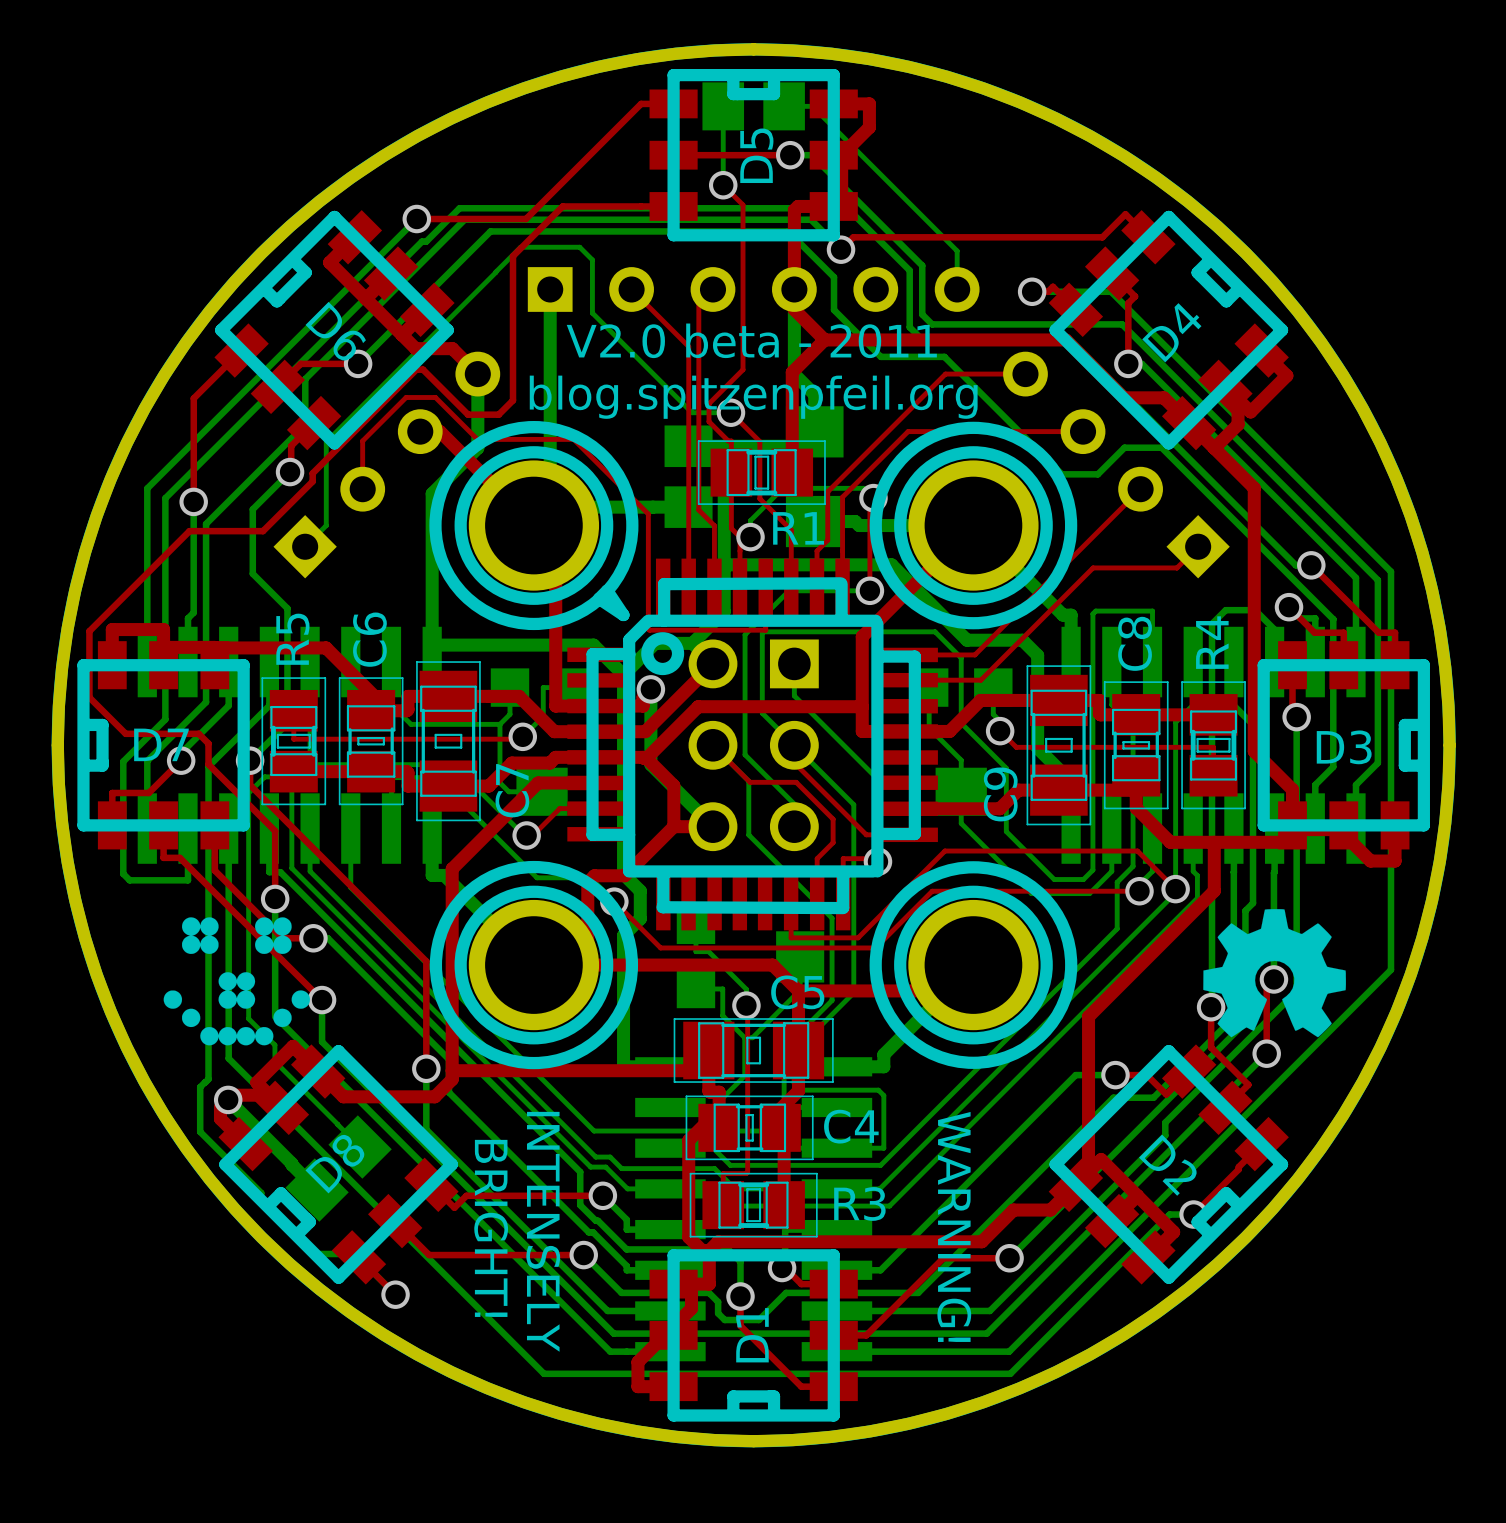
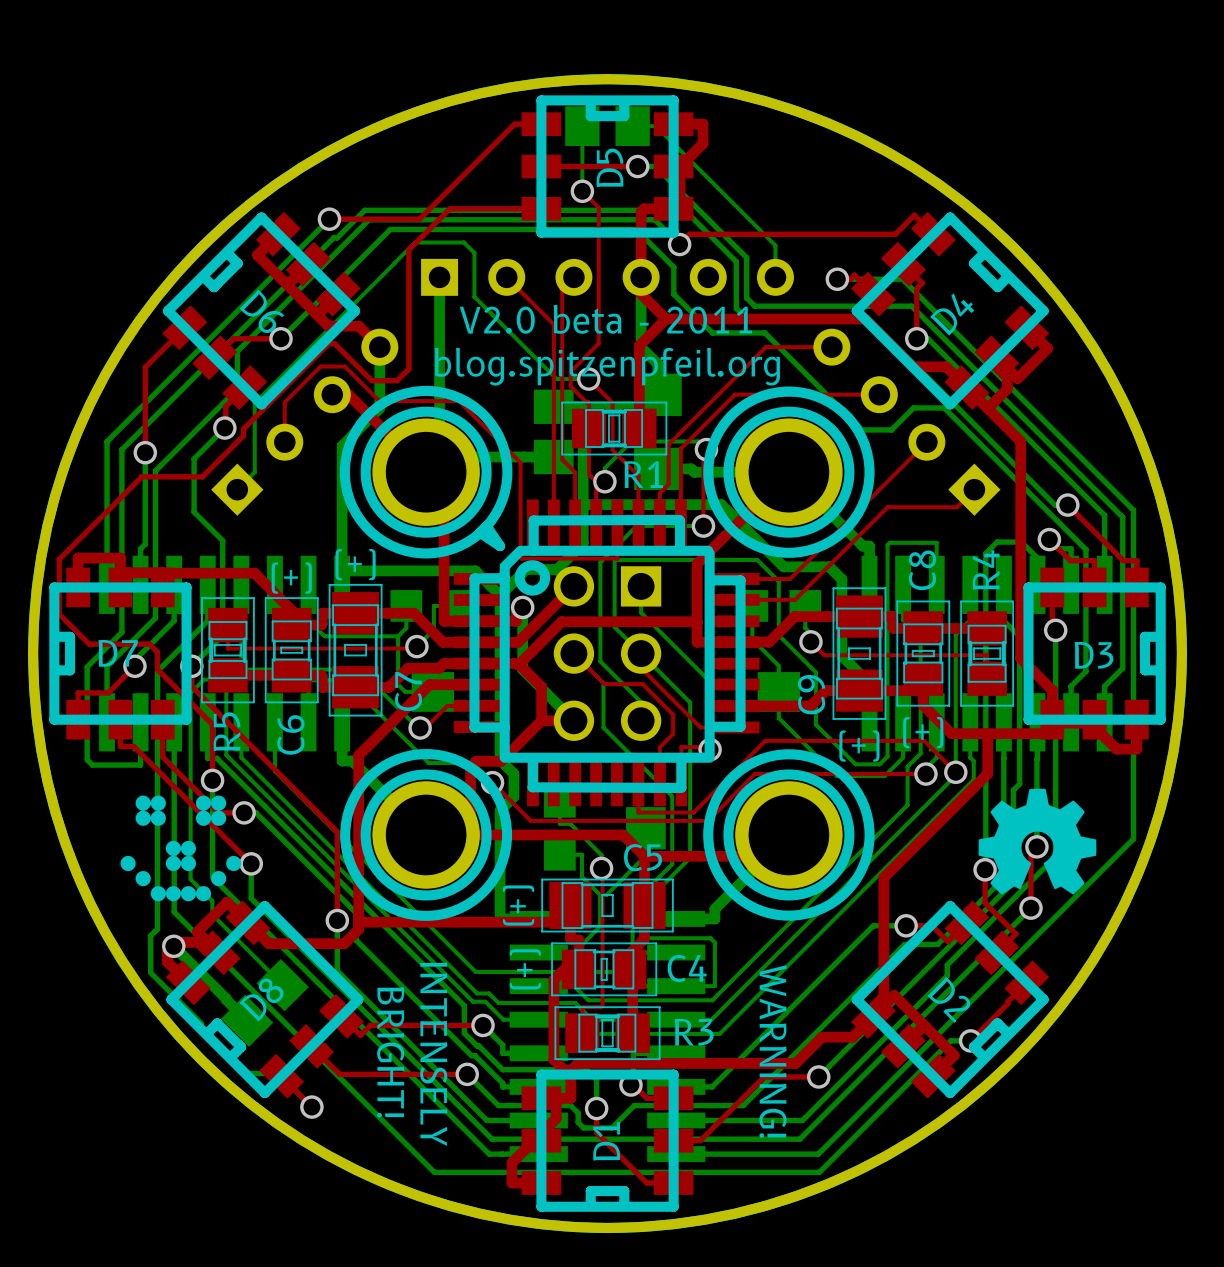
text: none -> (+) (355, 564)
R5 name position: R5 (292, 639) -> R5 (227, 731)
C6 name position: C6 (369, 639) -> C6 (290, 734)
text: none -> (+) (291, 578)
text: none -> (+) (923, 732)
text: none -> (+) (859, 746)
text: none -> (+) (518, 905)
text: none -> (+) (525, 969)

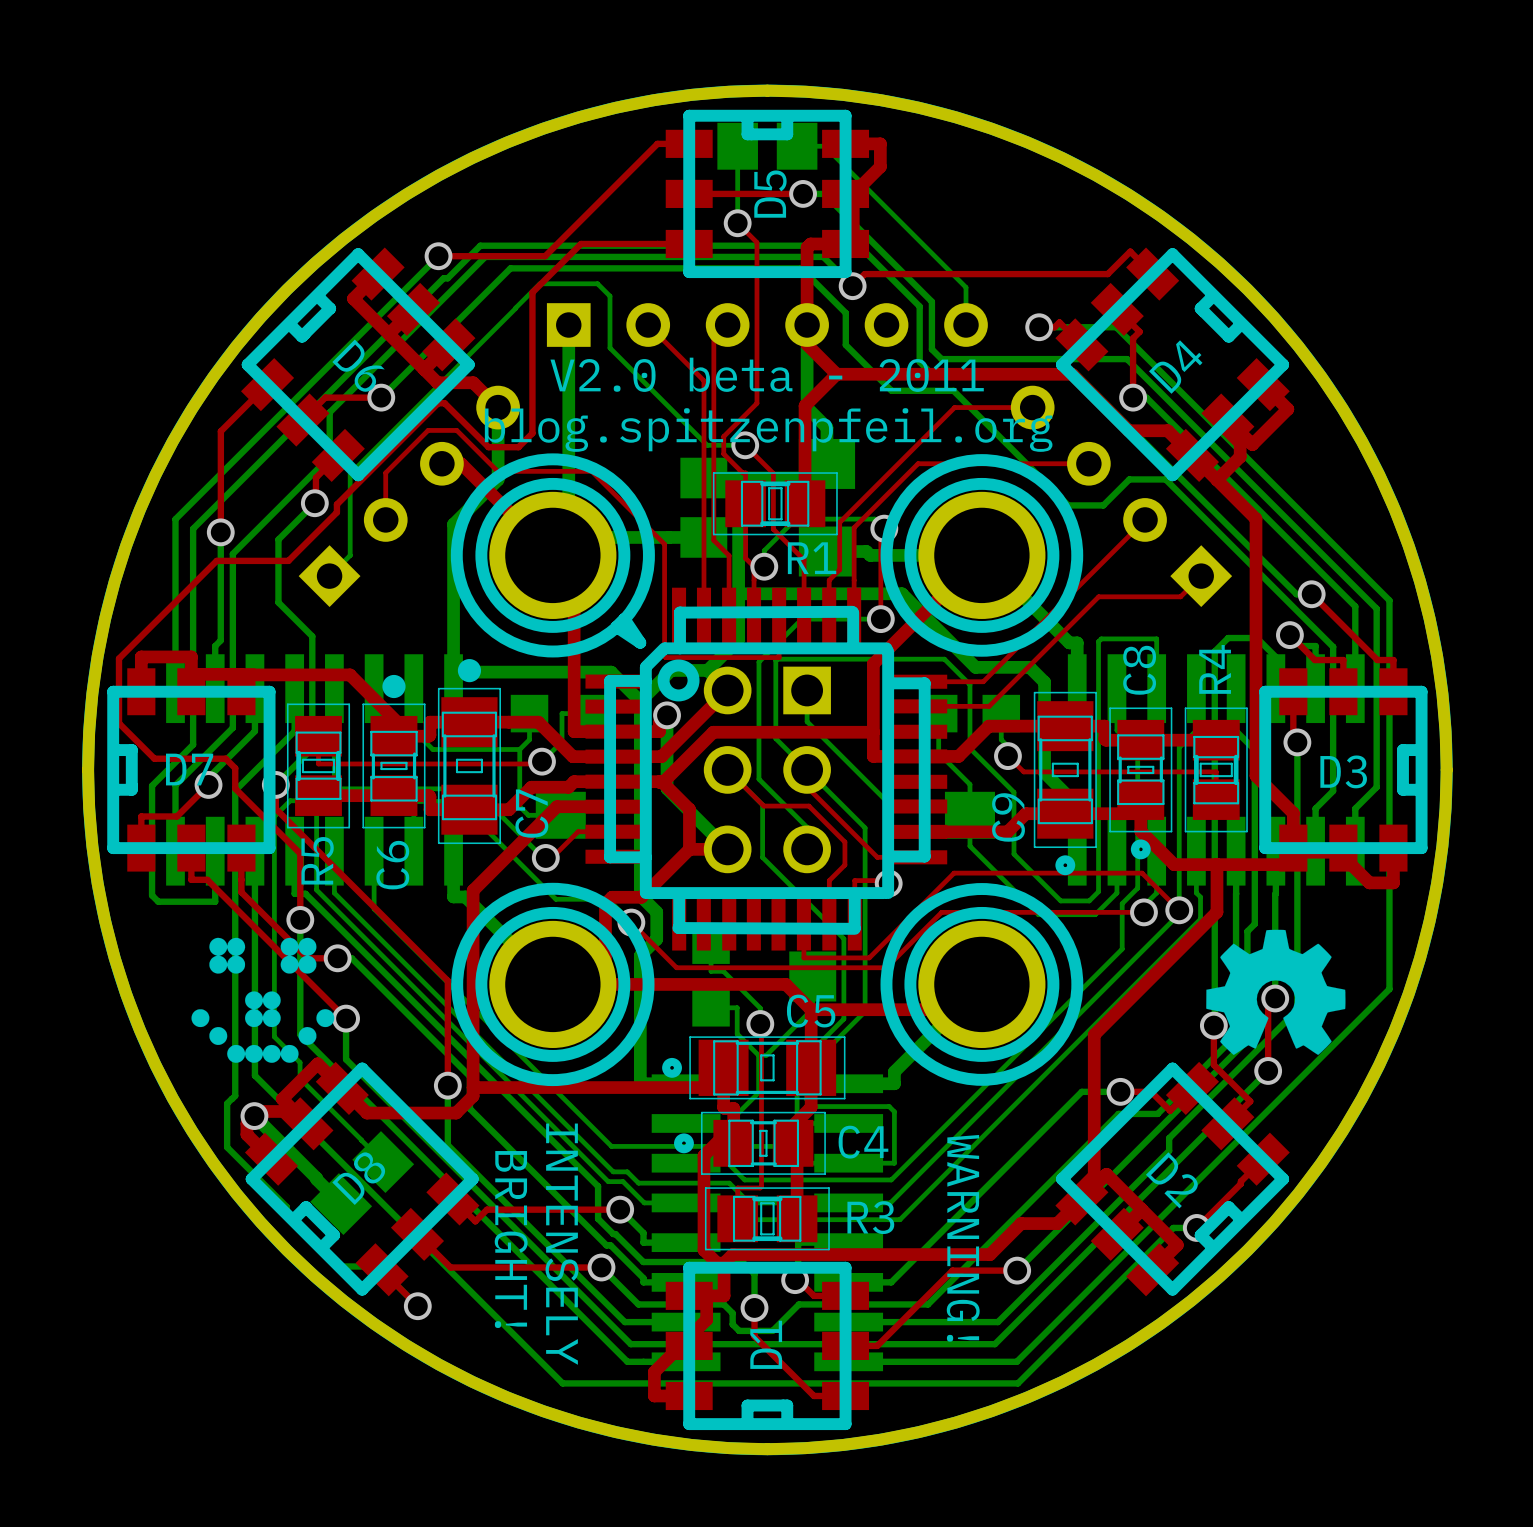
drawing: none -> [457, 659, 482, 683]
text: (+) (355, 564) -> none
drawing: none -> [382, 674, 406, 699]
text: (+) (291, 578) -> none
drawing: none -> [1130, 839, 1151, 860]
drawing: none -> [1055, 855, 1076, 876]
text: (+) (923, 732) -> none
text: (+) (859, 746) -> none
drawing: none -> [662, 1057, 682, 1078]
text: (+) (518, 905) -> none
drawing: none -> [674, 1133, 694, 1154]
text: (+) (525, 969) -> none

